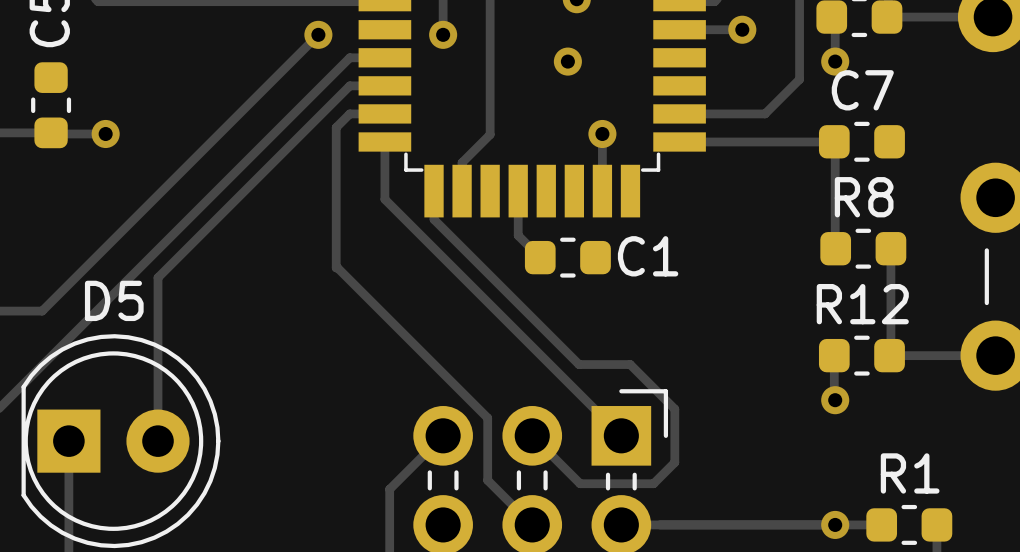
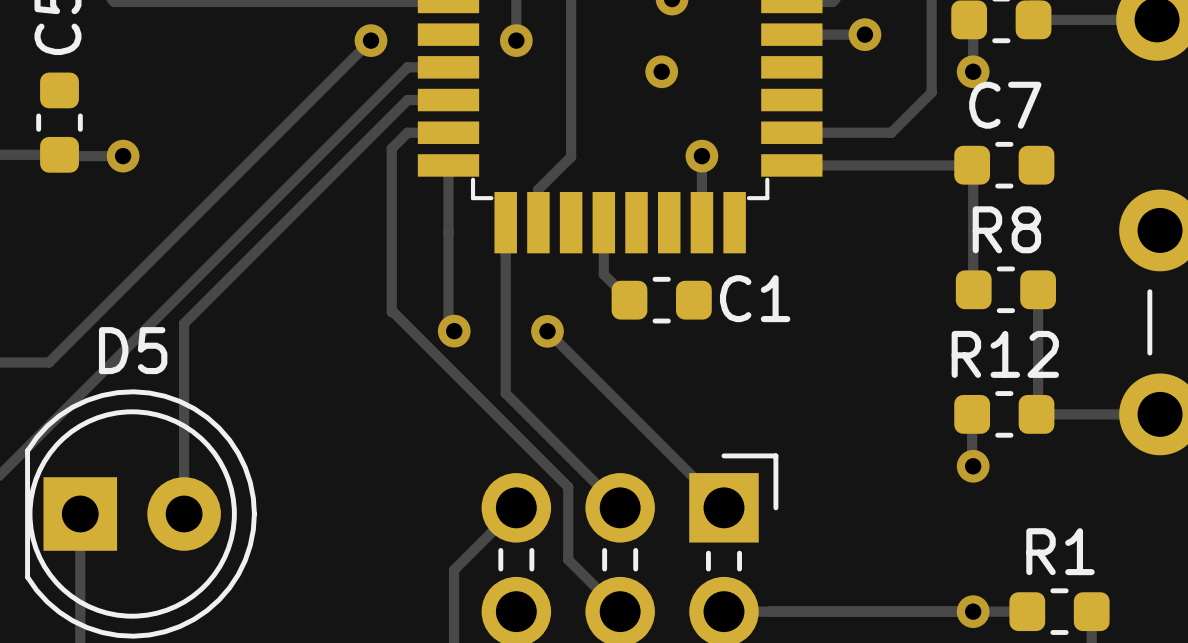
track: (384, 199) (469, 284) -> (448, 232) (448, 325) (453, 331)
track: (434, 219) (579, 364) (630, 364) (674, 409) (674, 462) (653, 483) (580, 483) (532, 435) -> (505, 255) (505, 393) (620, 507)
via: none -> (454, 331)
via: none -> (547, 331)

